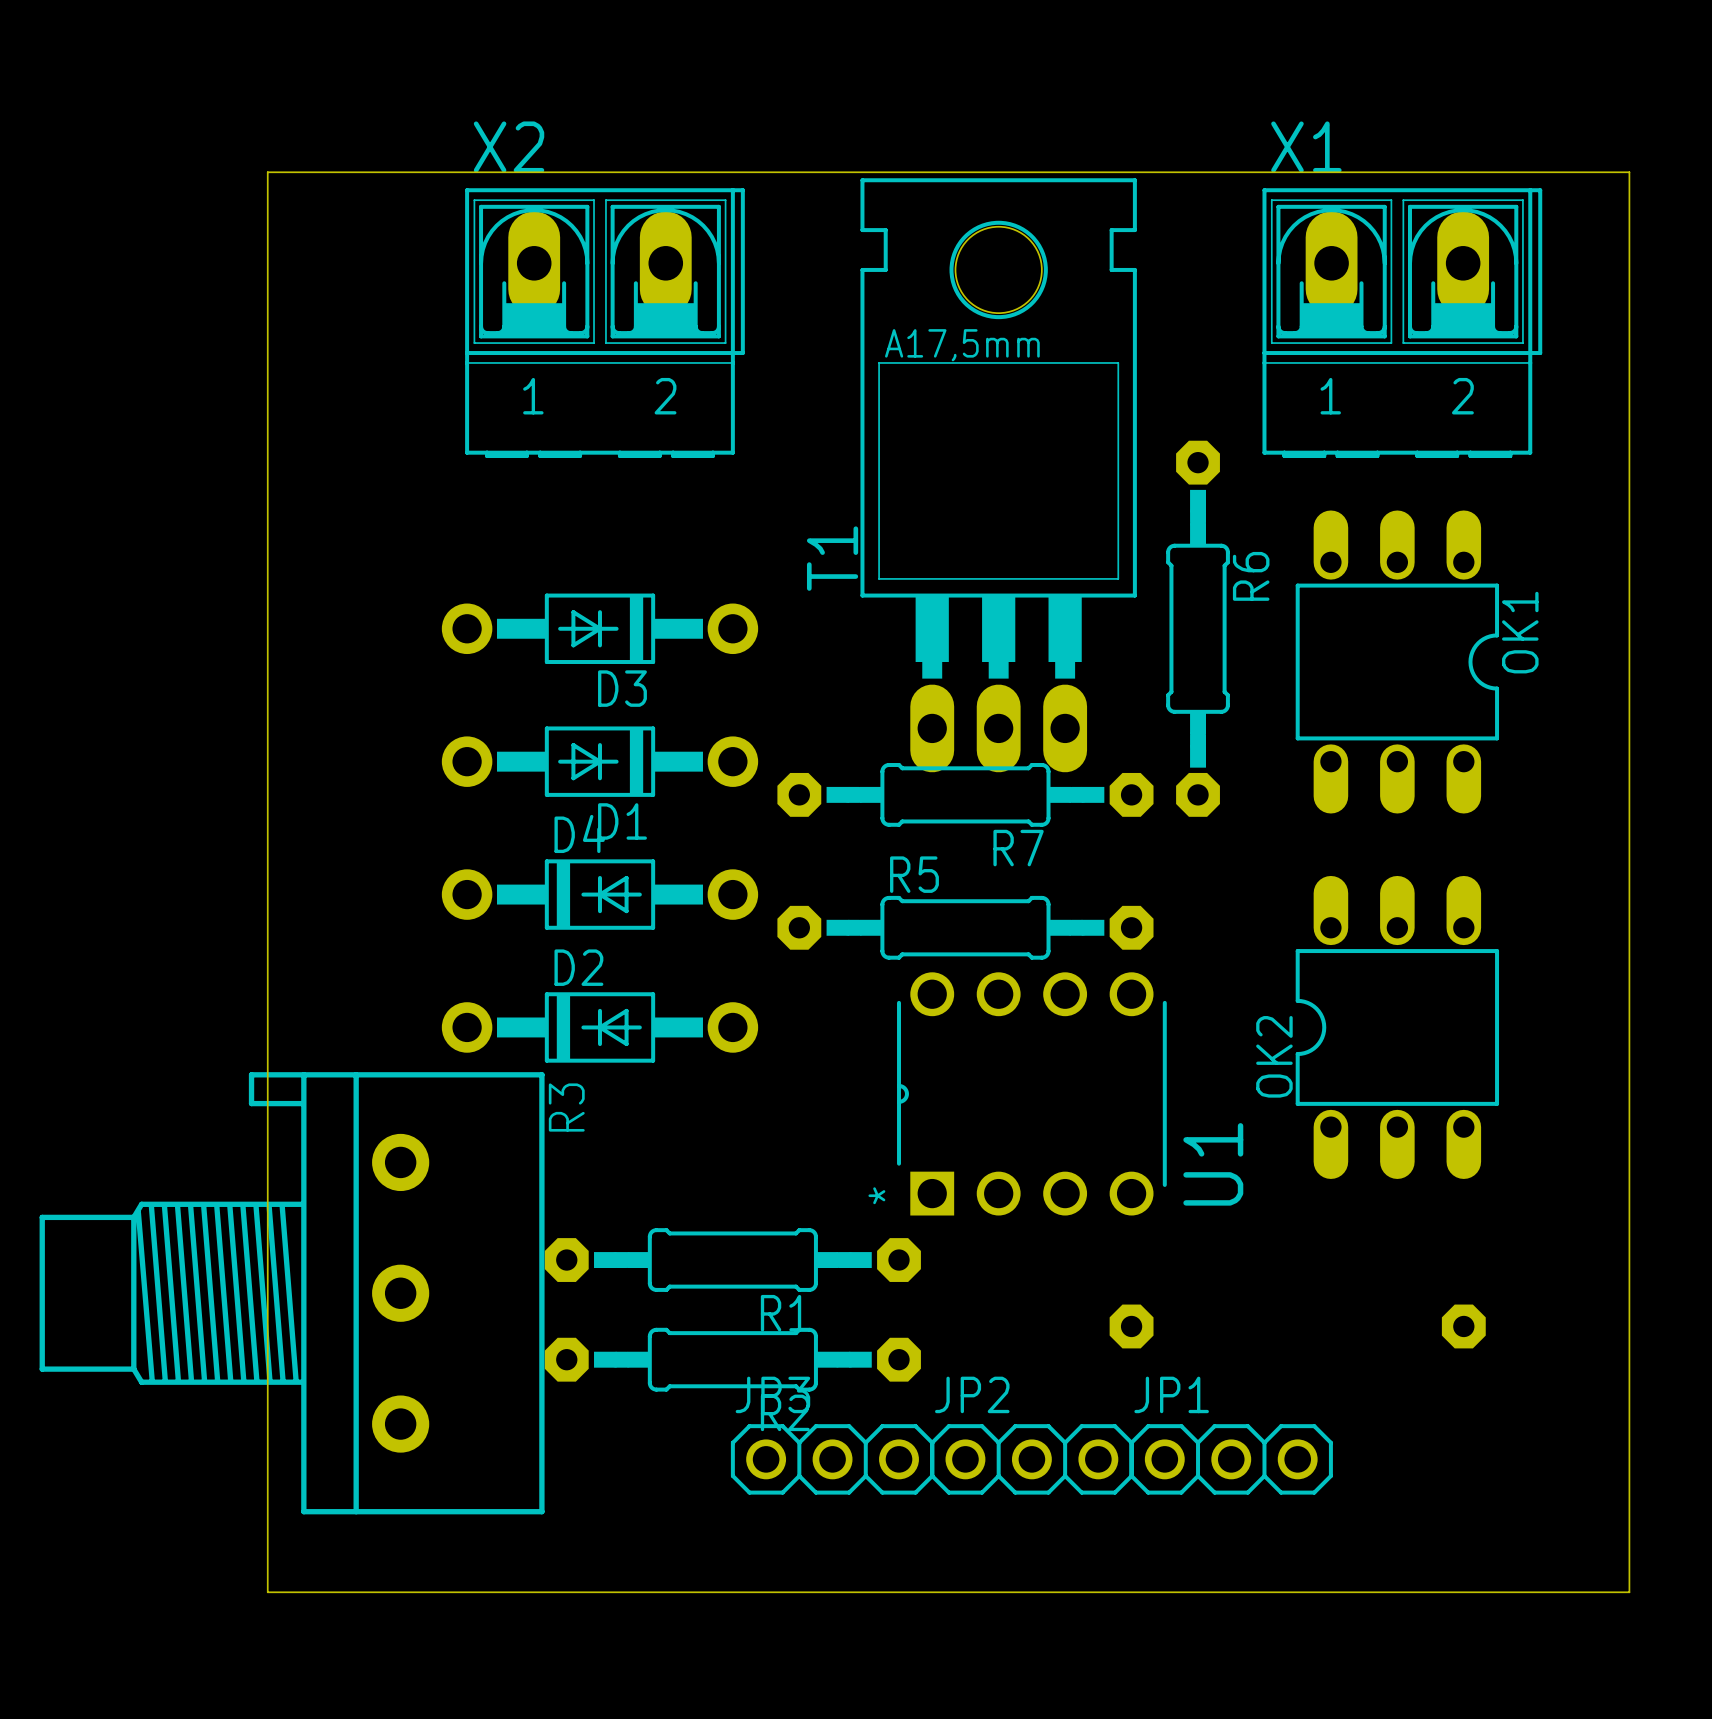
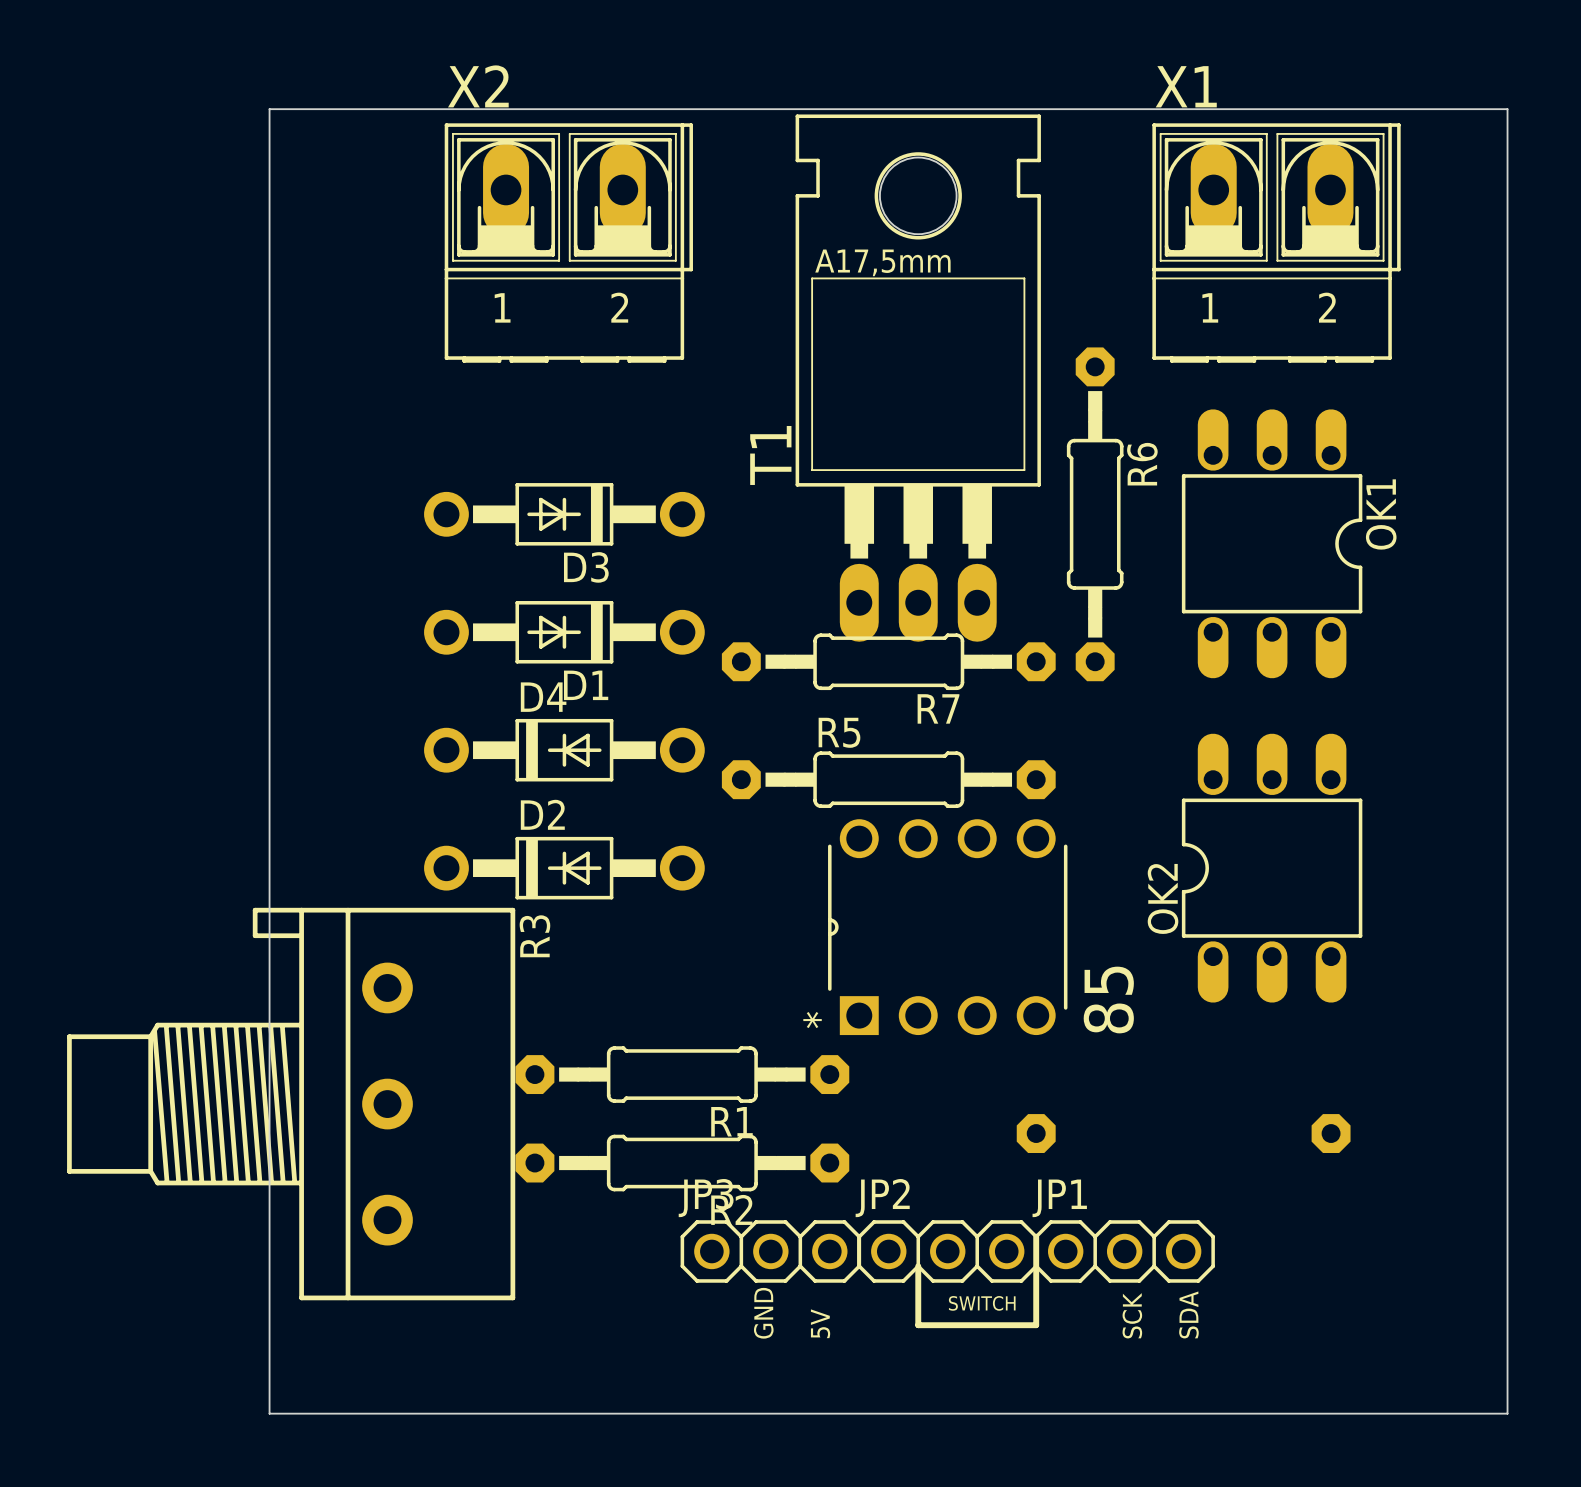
board edge: (1629, 172) (1629, 1592) (267, 1592) -> (1478, 109) (1507, 109) (1507, 1413) (269, 1413) (269, 1369)
U1 name: U1 (1213, 1164) -> 85 (1108, 1000)
line: none -> (1036, 1236) (1036, 1325) (918, 1325) (918, 1266)
text: none -> SWITCH (982, 1303)
text: none -> GND (763, 1313)
text: none -> SCK (1132, 1315)
text: none -> SDA (1188, 1314)
text: none -> 5V (820, 1323)

